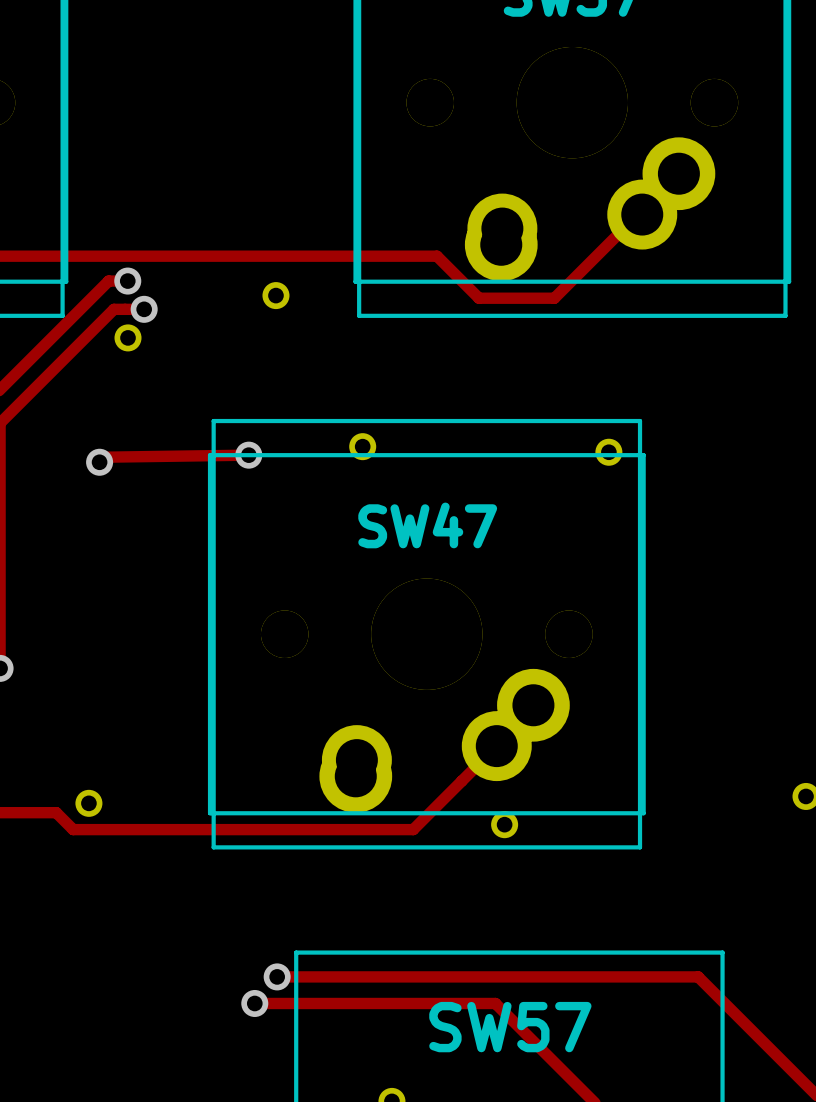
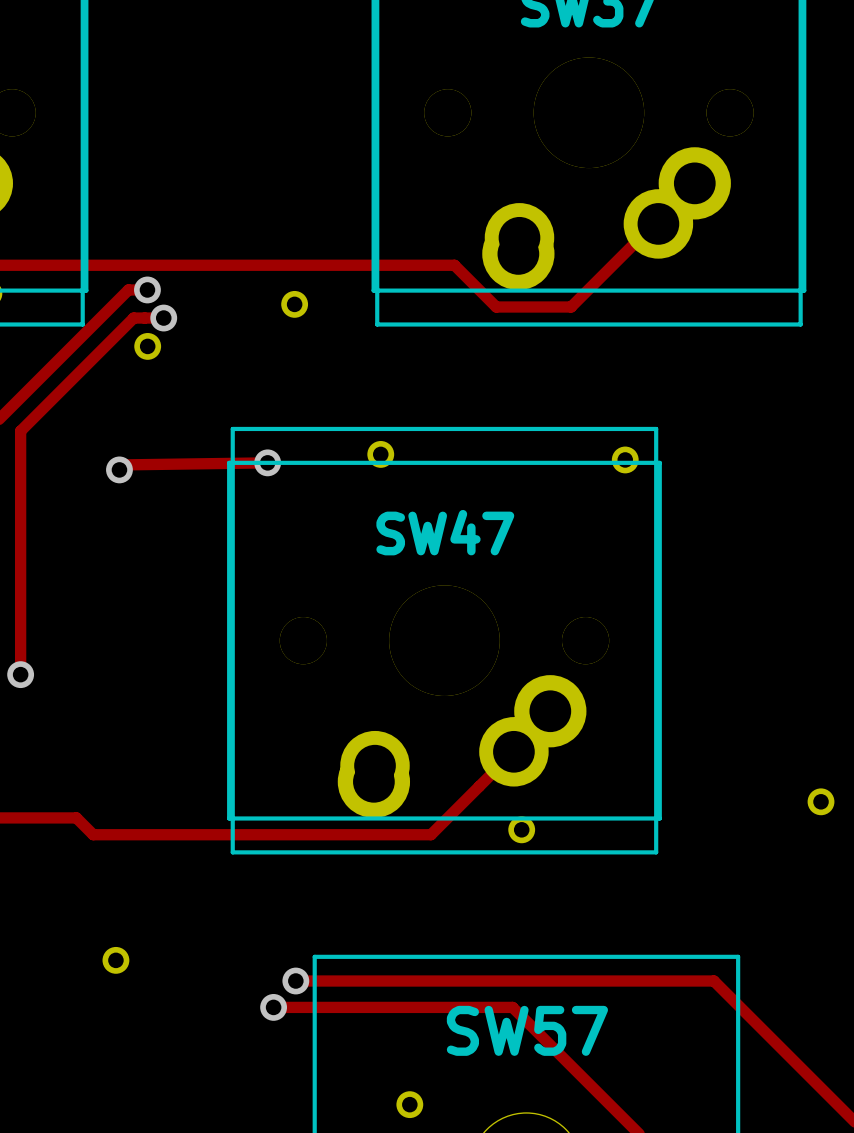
part position: (88, 803) -> (115, 960)

